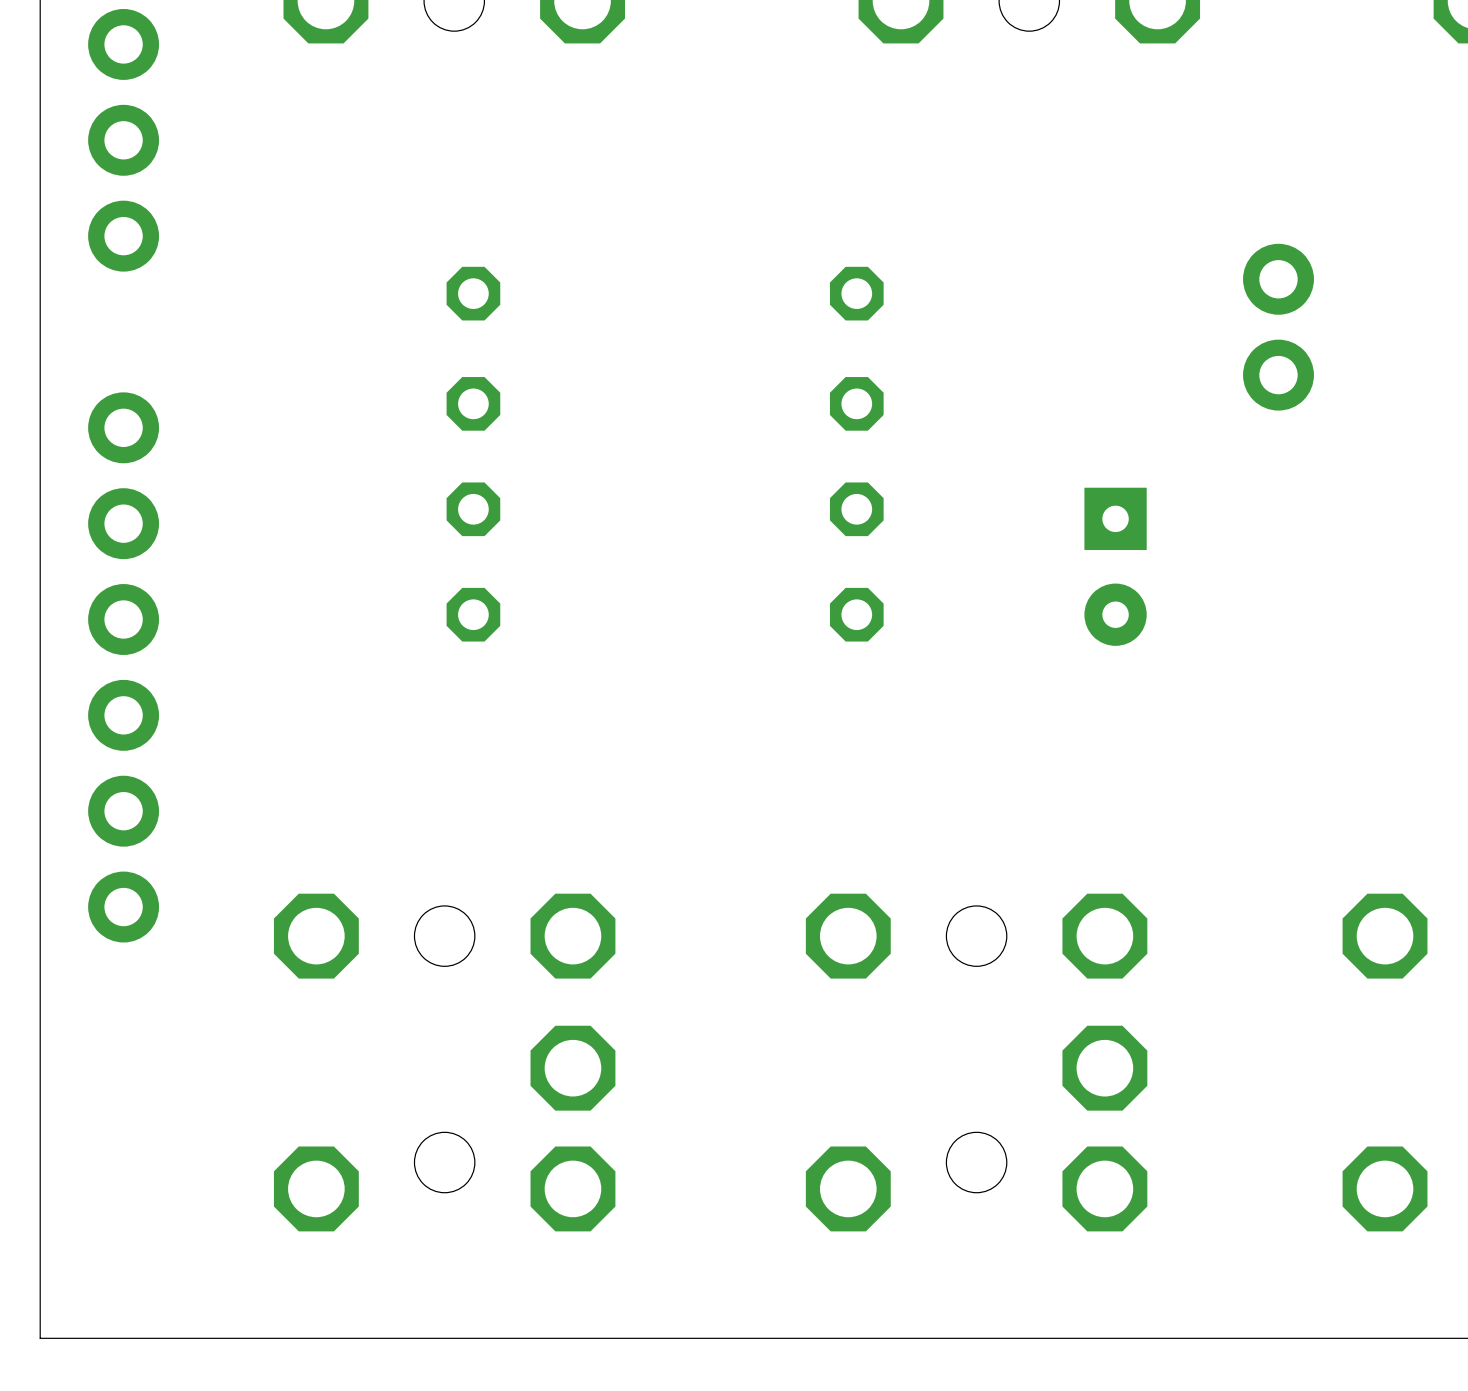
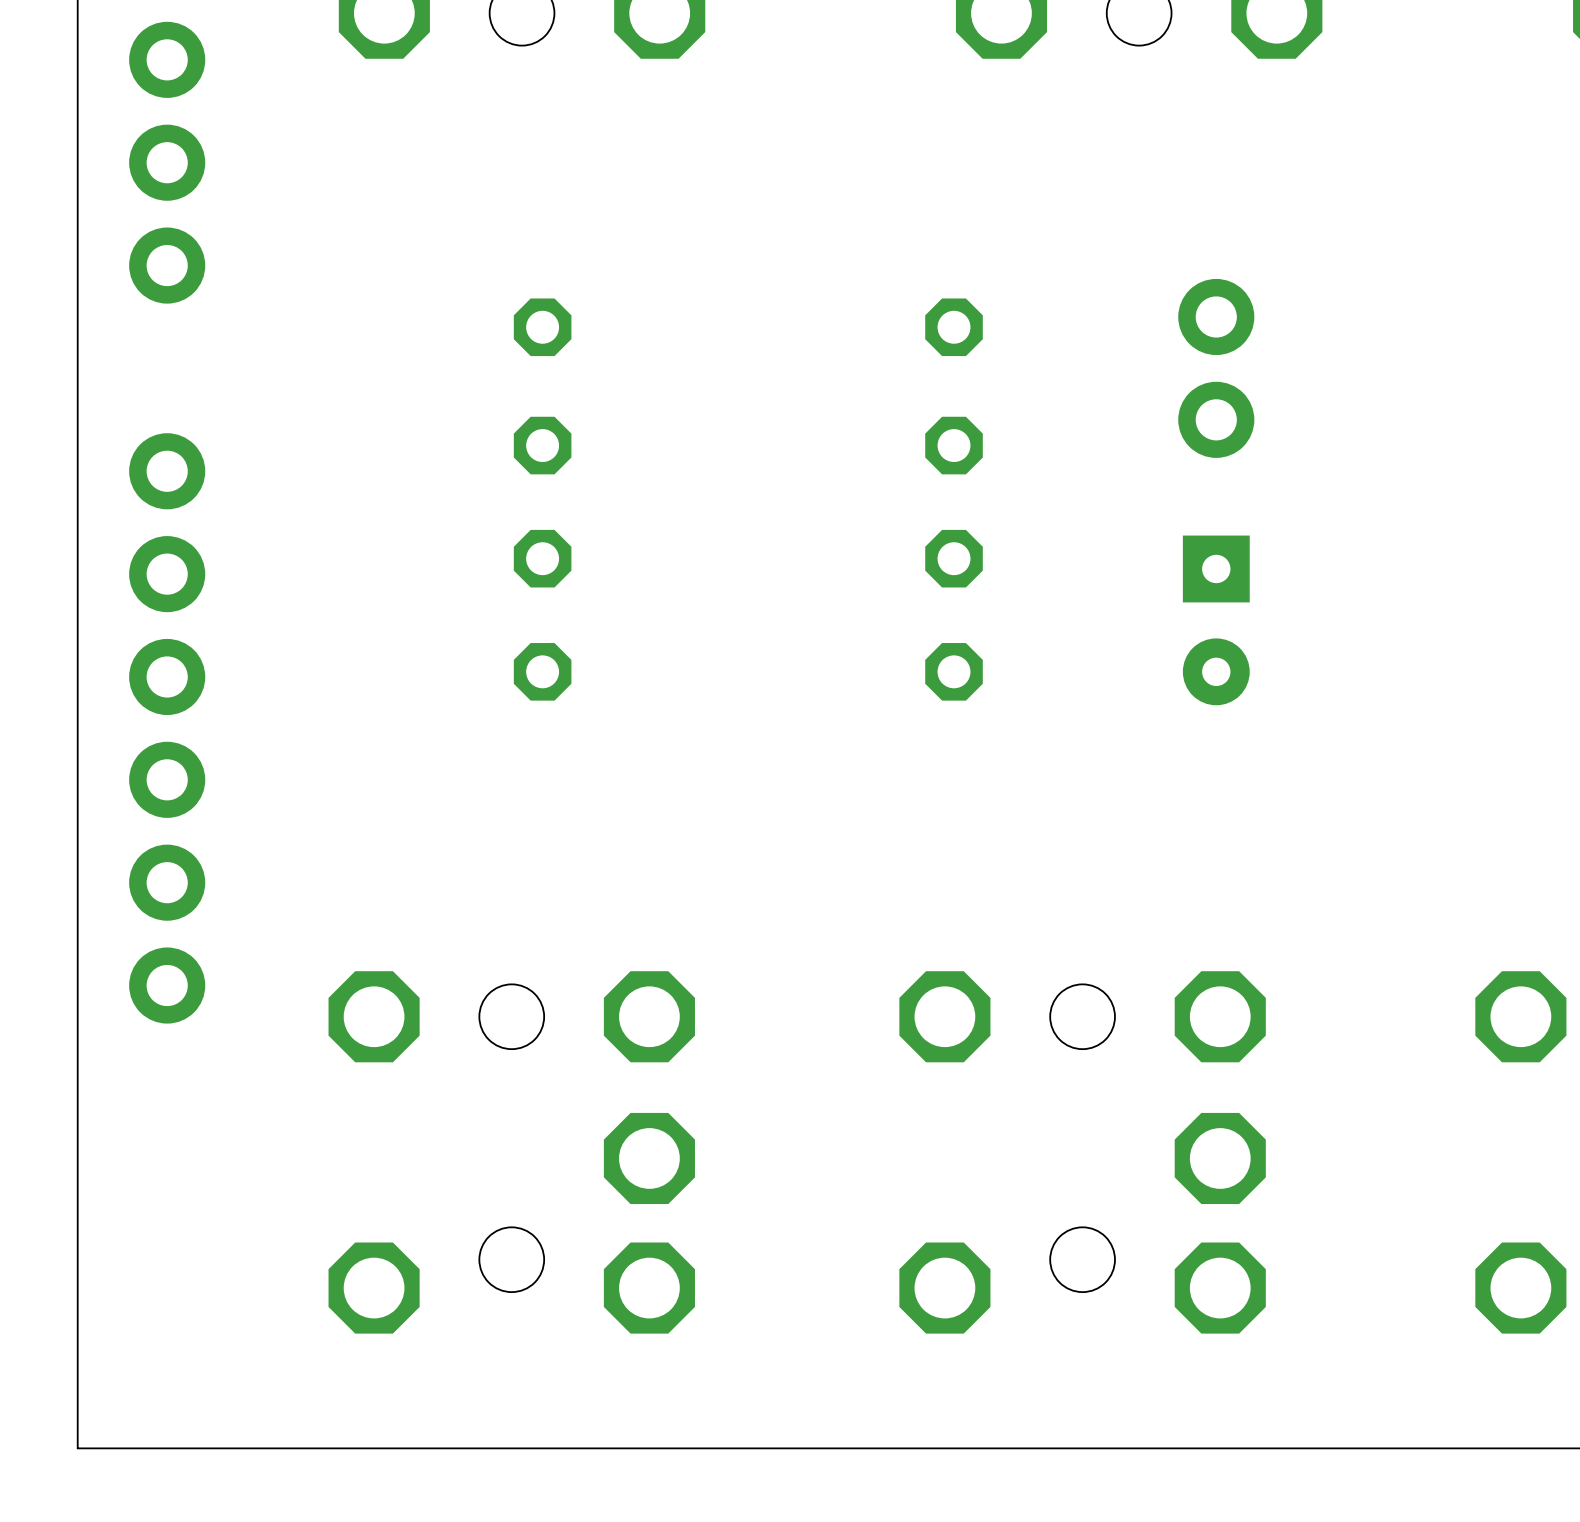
part position: (1278, 327) -> (1216, 368)
part position: (1115, 566) -> (1216, 620)

